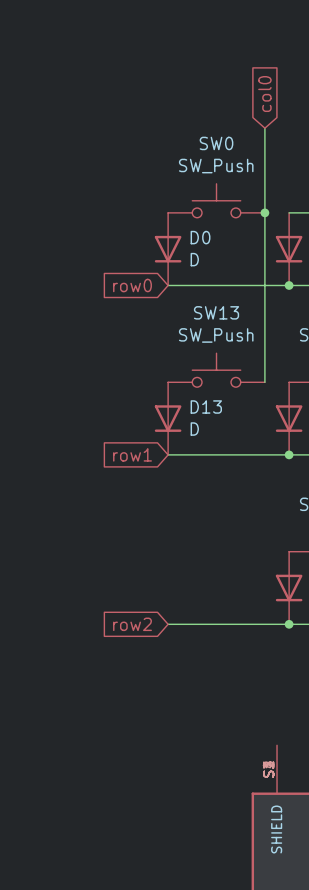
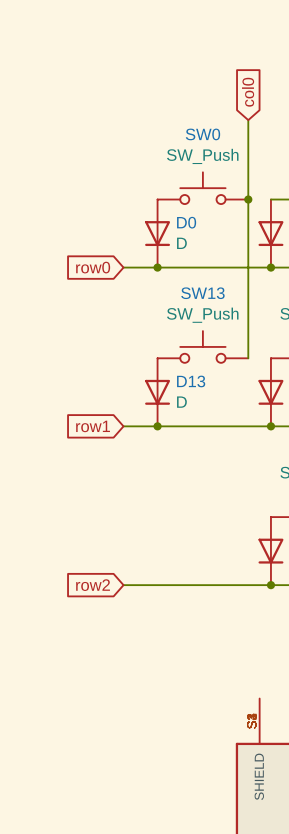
wire: none -> (123, 267) (157, 267)
global label position: row0 (132, 285) -> row0 (93, 267)
junction: none -> (157, 267)
wire: none -> (123, 426) (157, 426)
global label position: row1 (132, 454) -> row1 (93, 426)
junction: none -> (157, 426)
wire: none -> (123, 585) (157, 585)
global label position: row2 (132, 624) -> row2 (93, 585)

